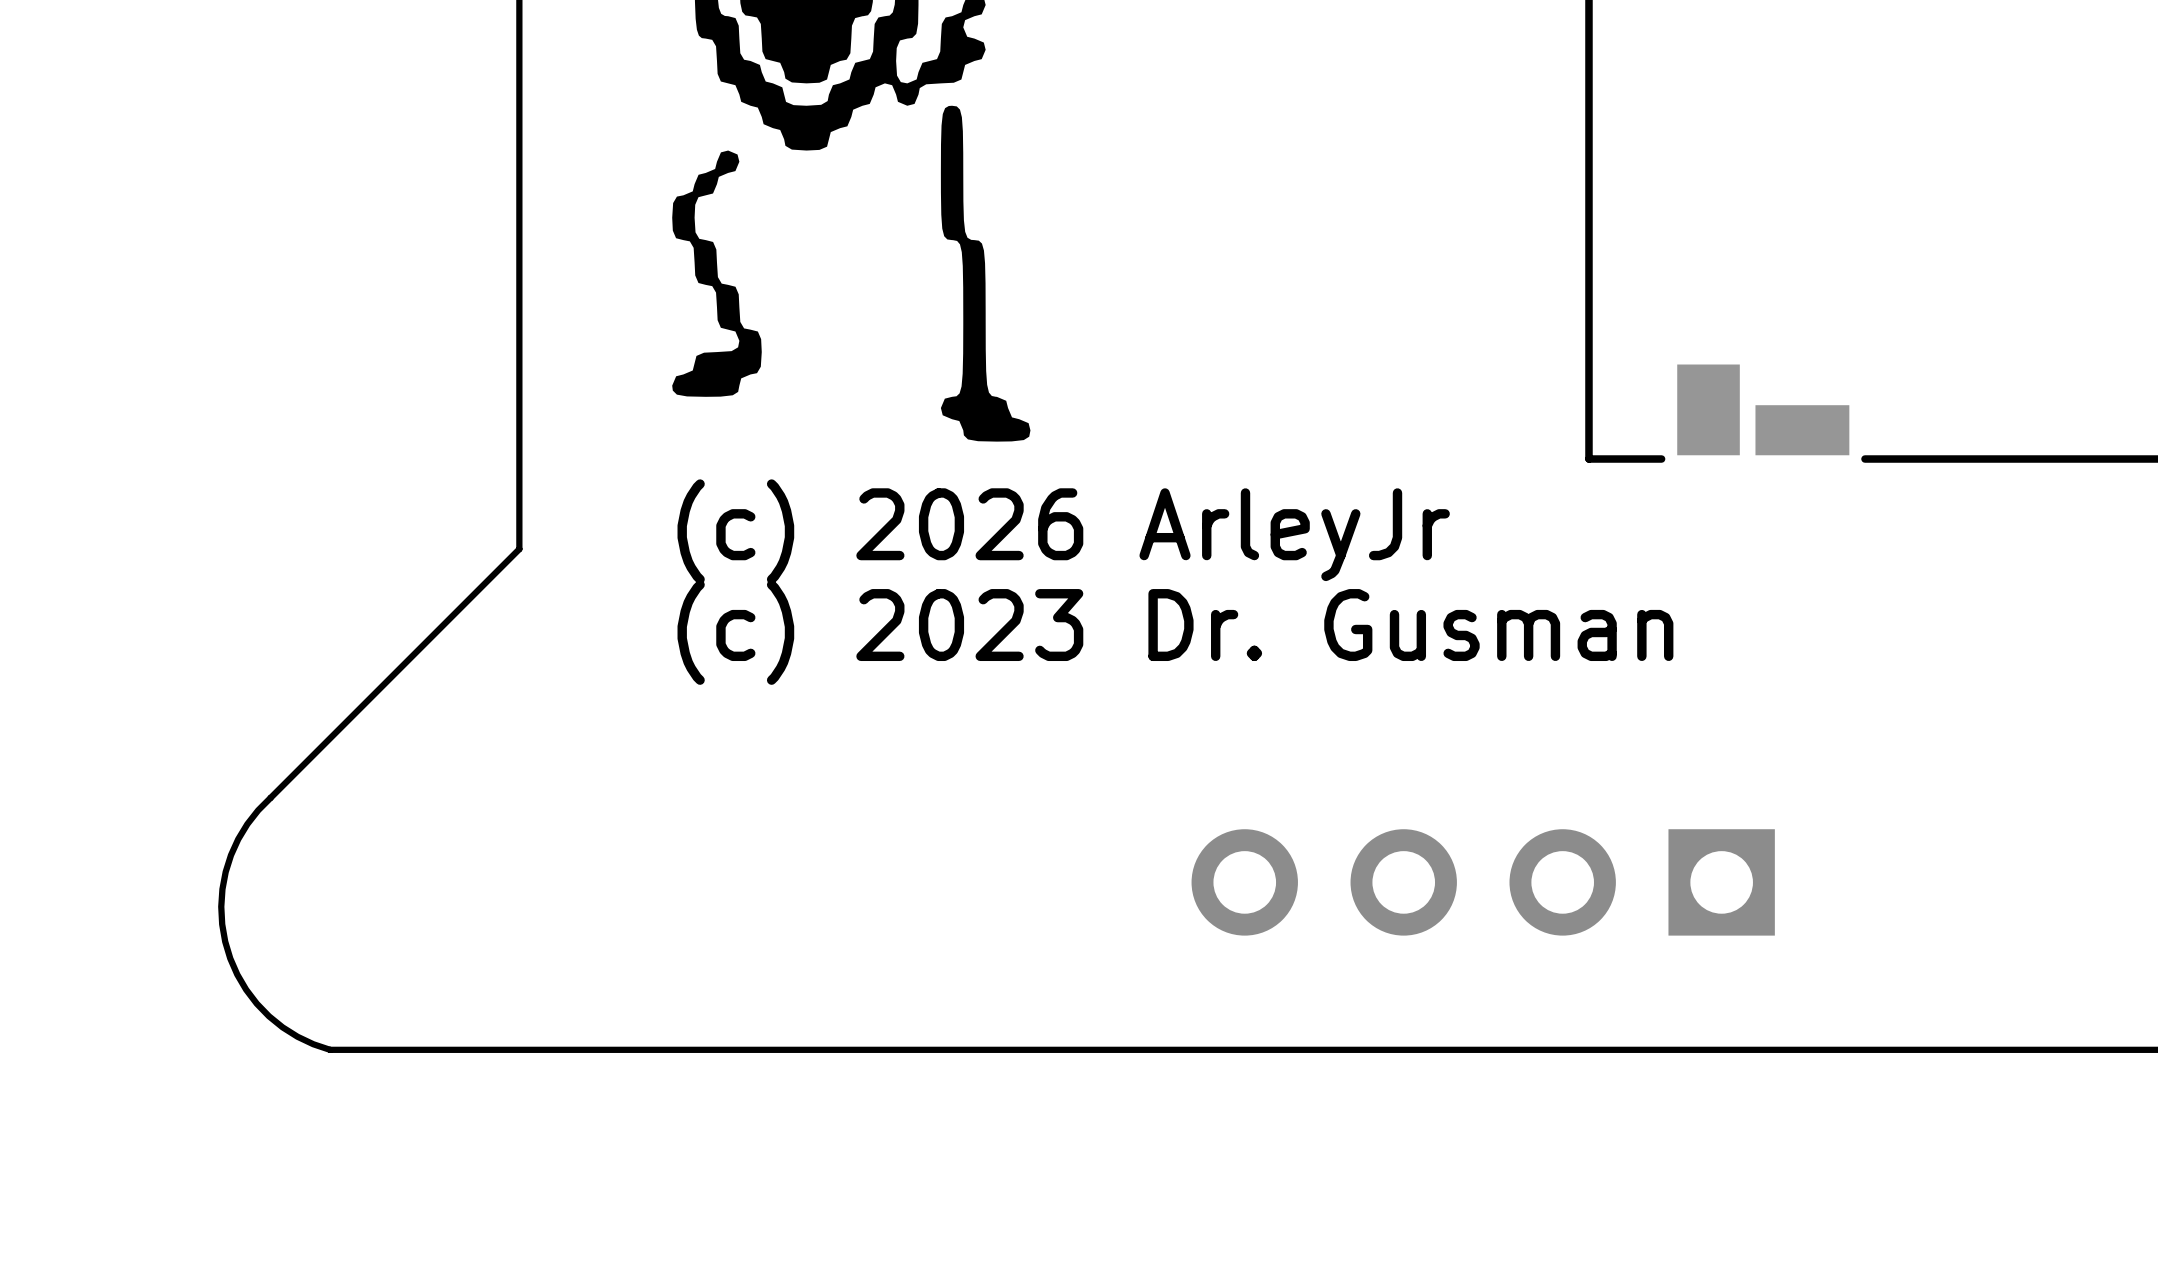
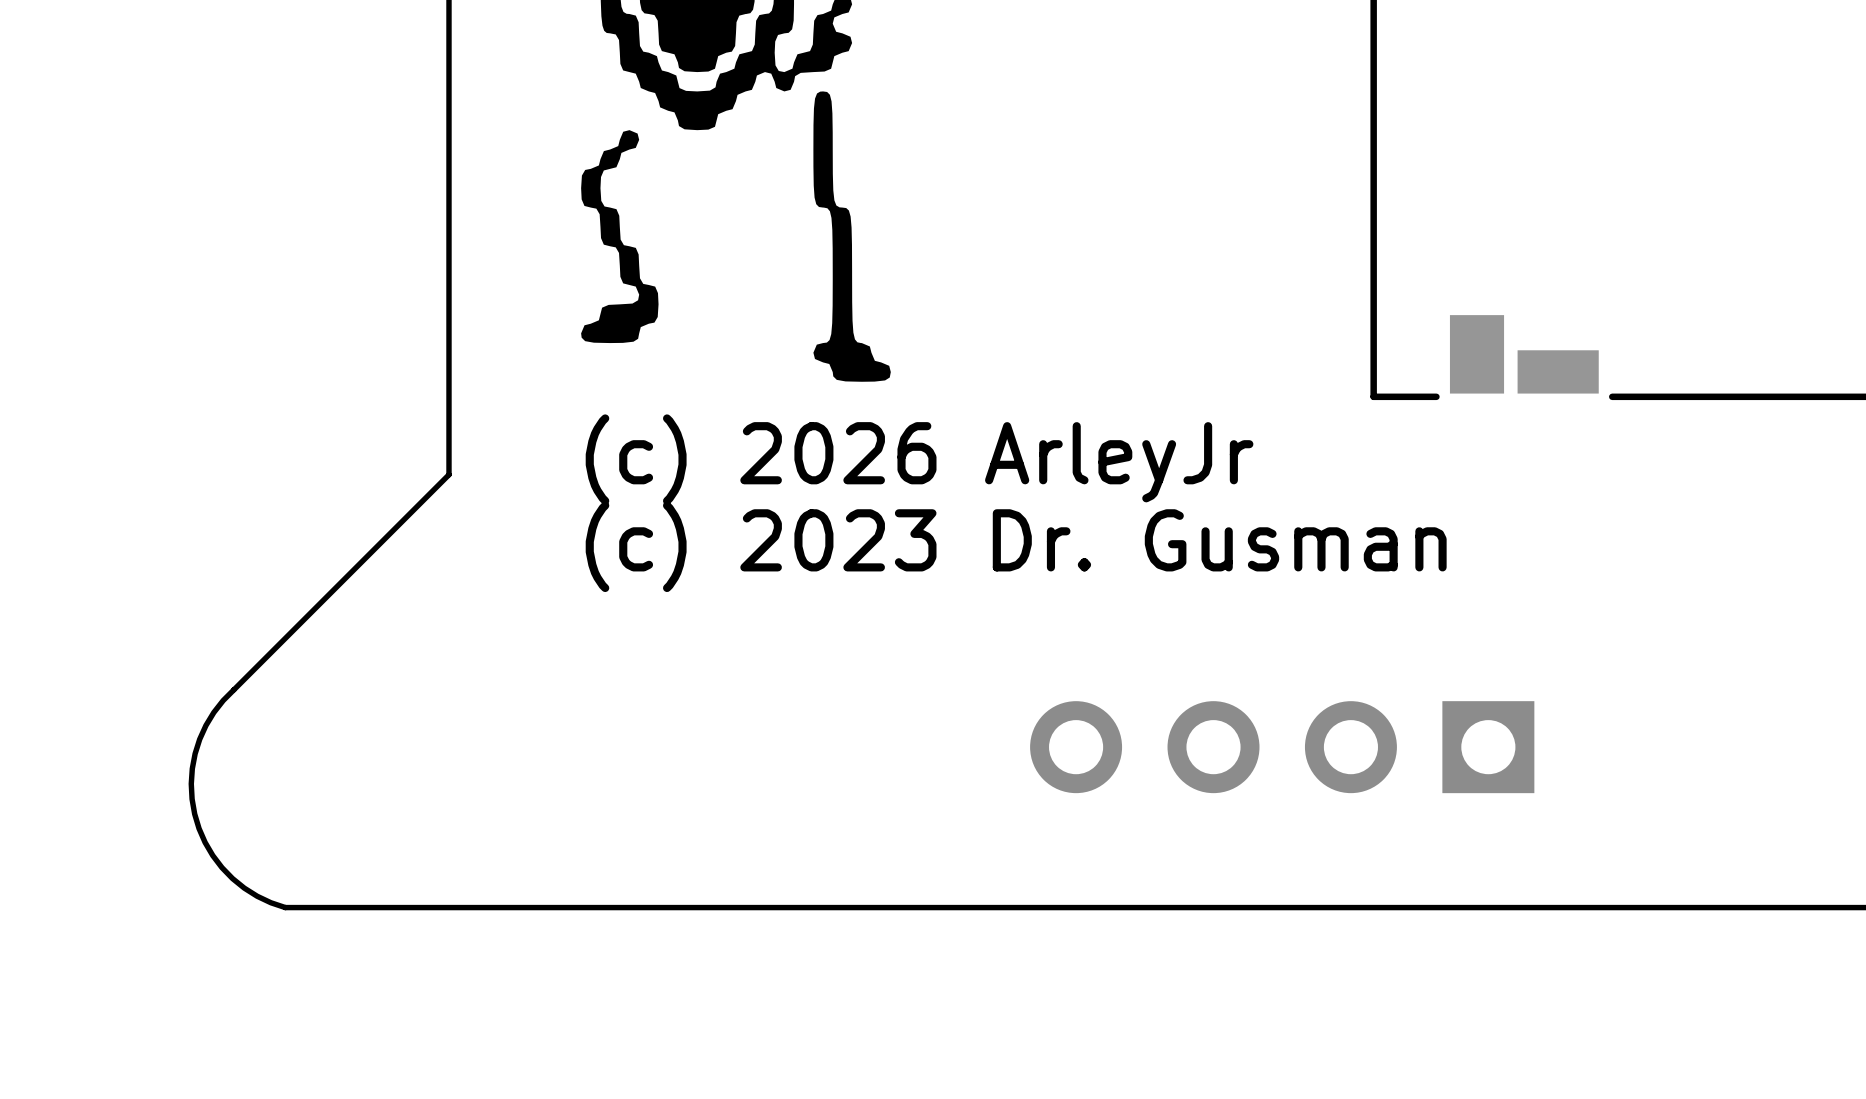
part position: (1483, 882) -> (1282, 747)

